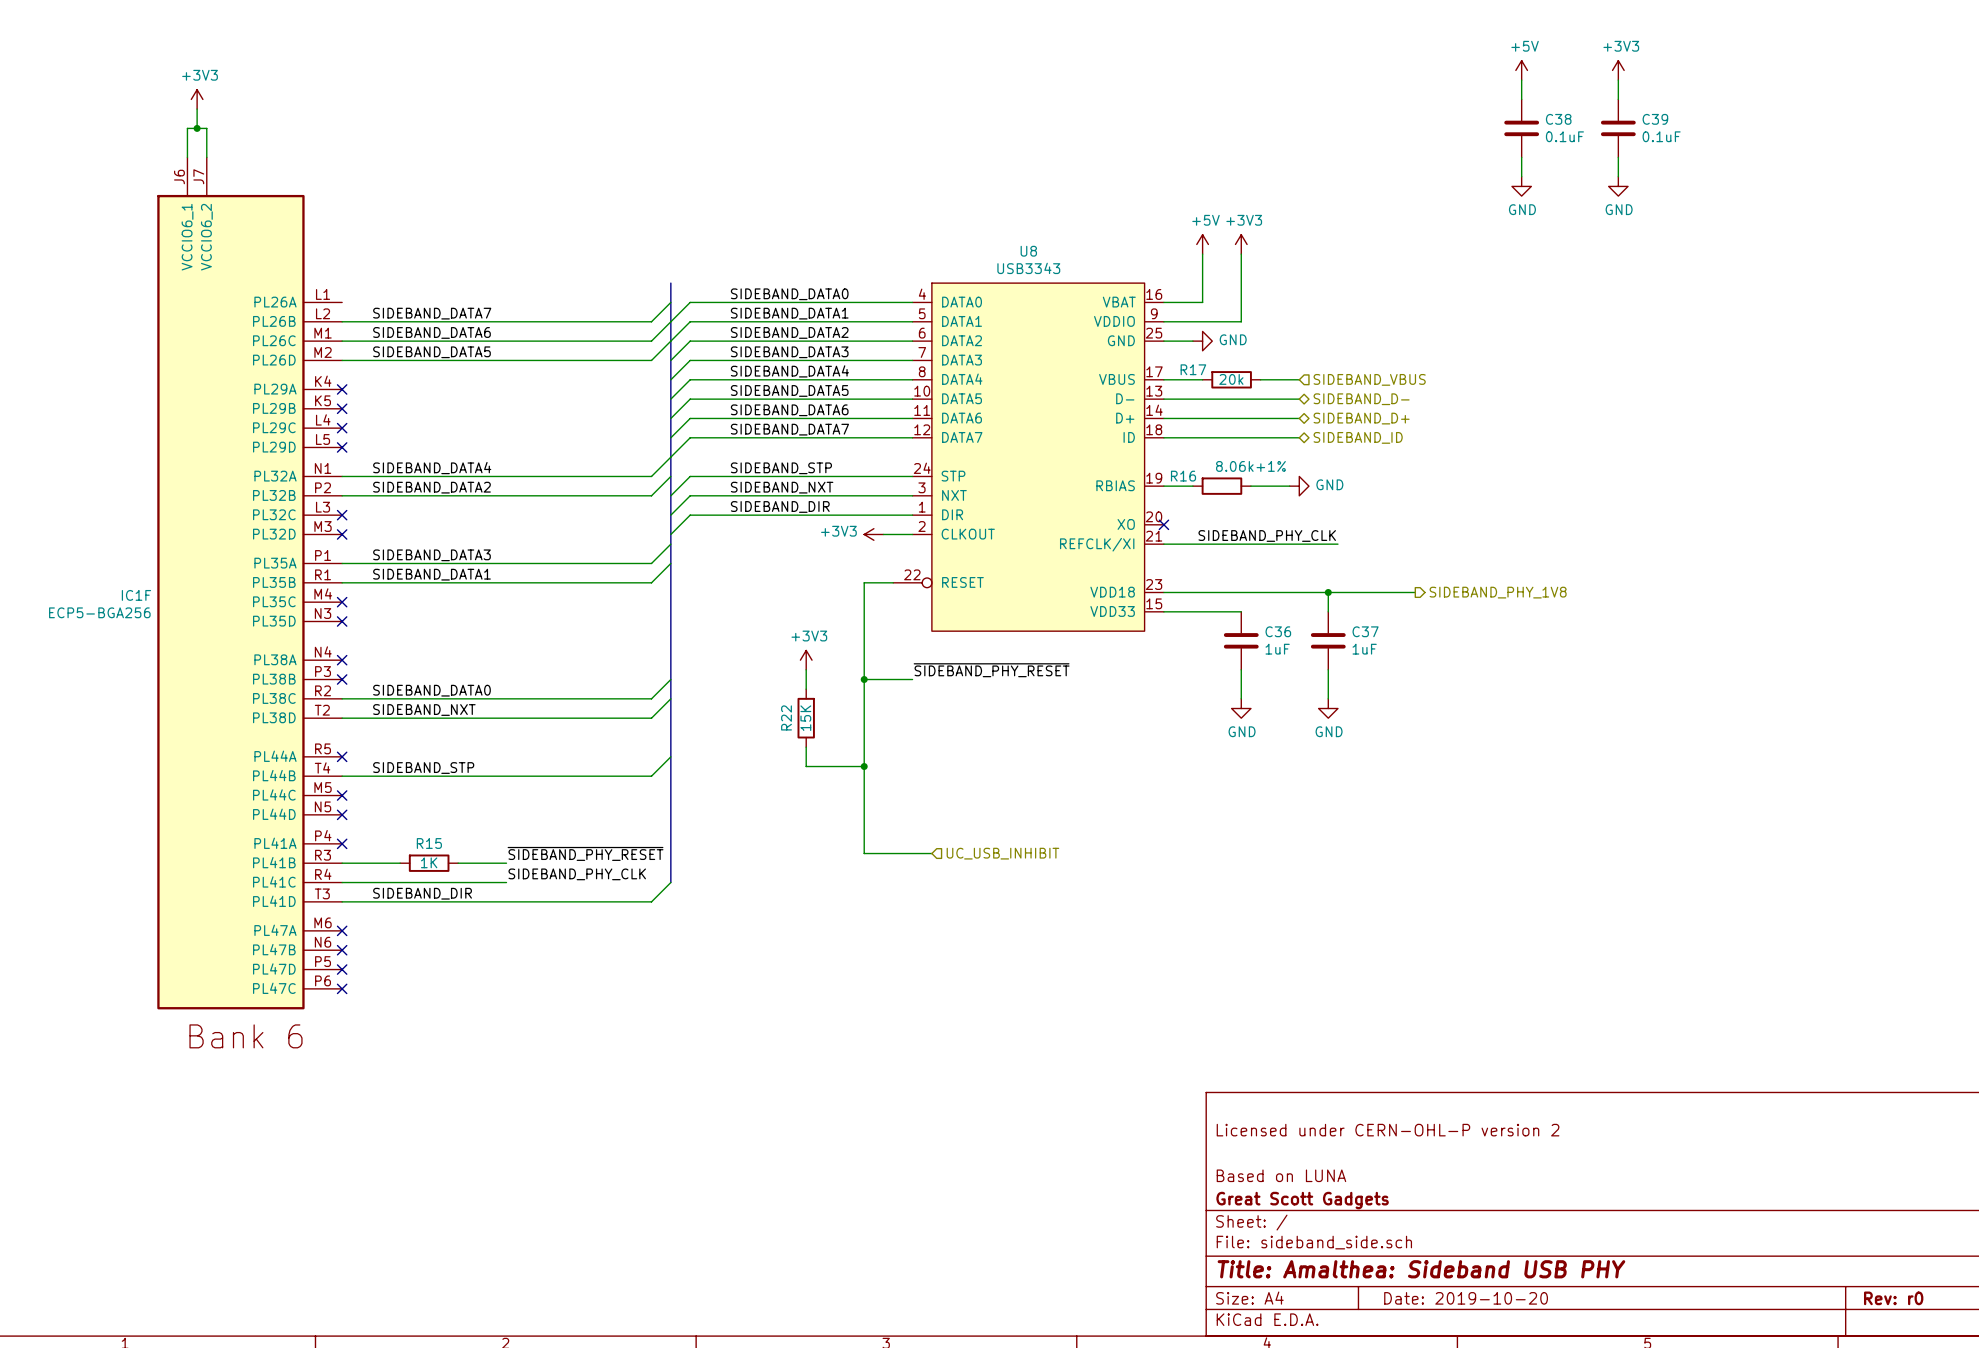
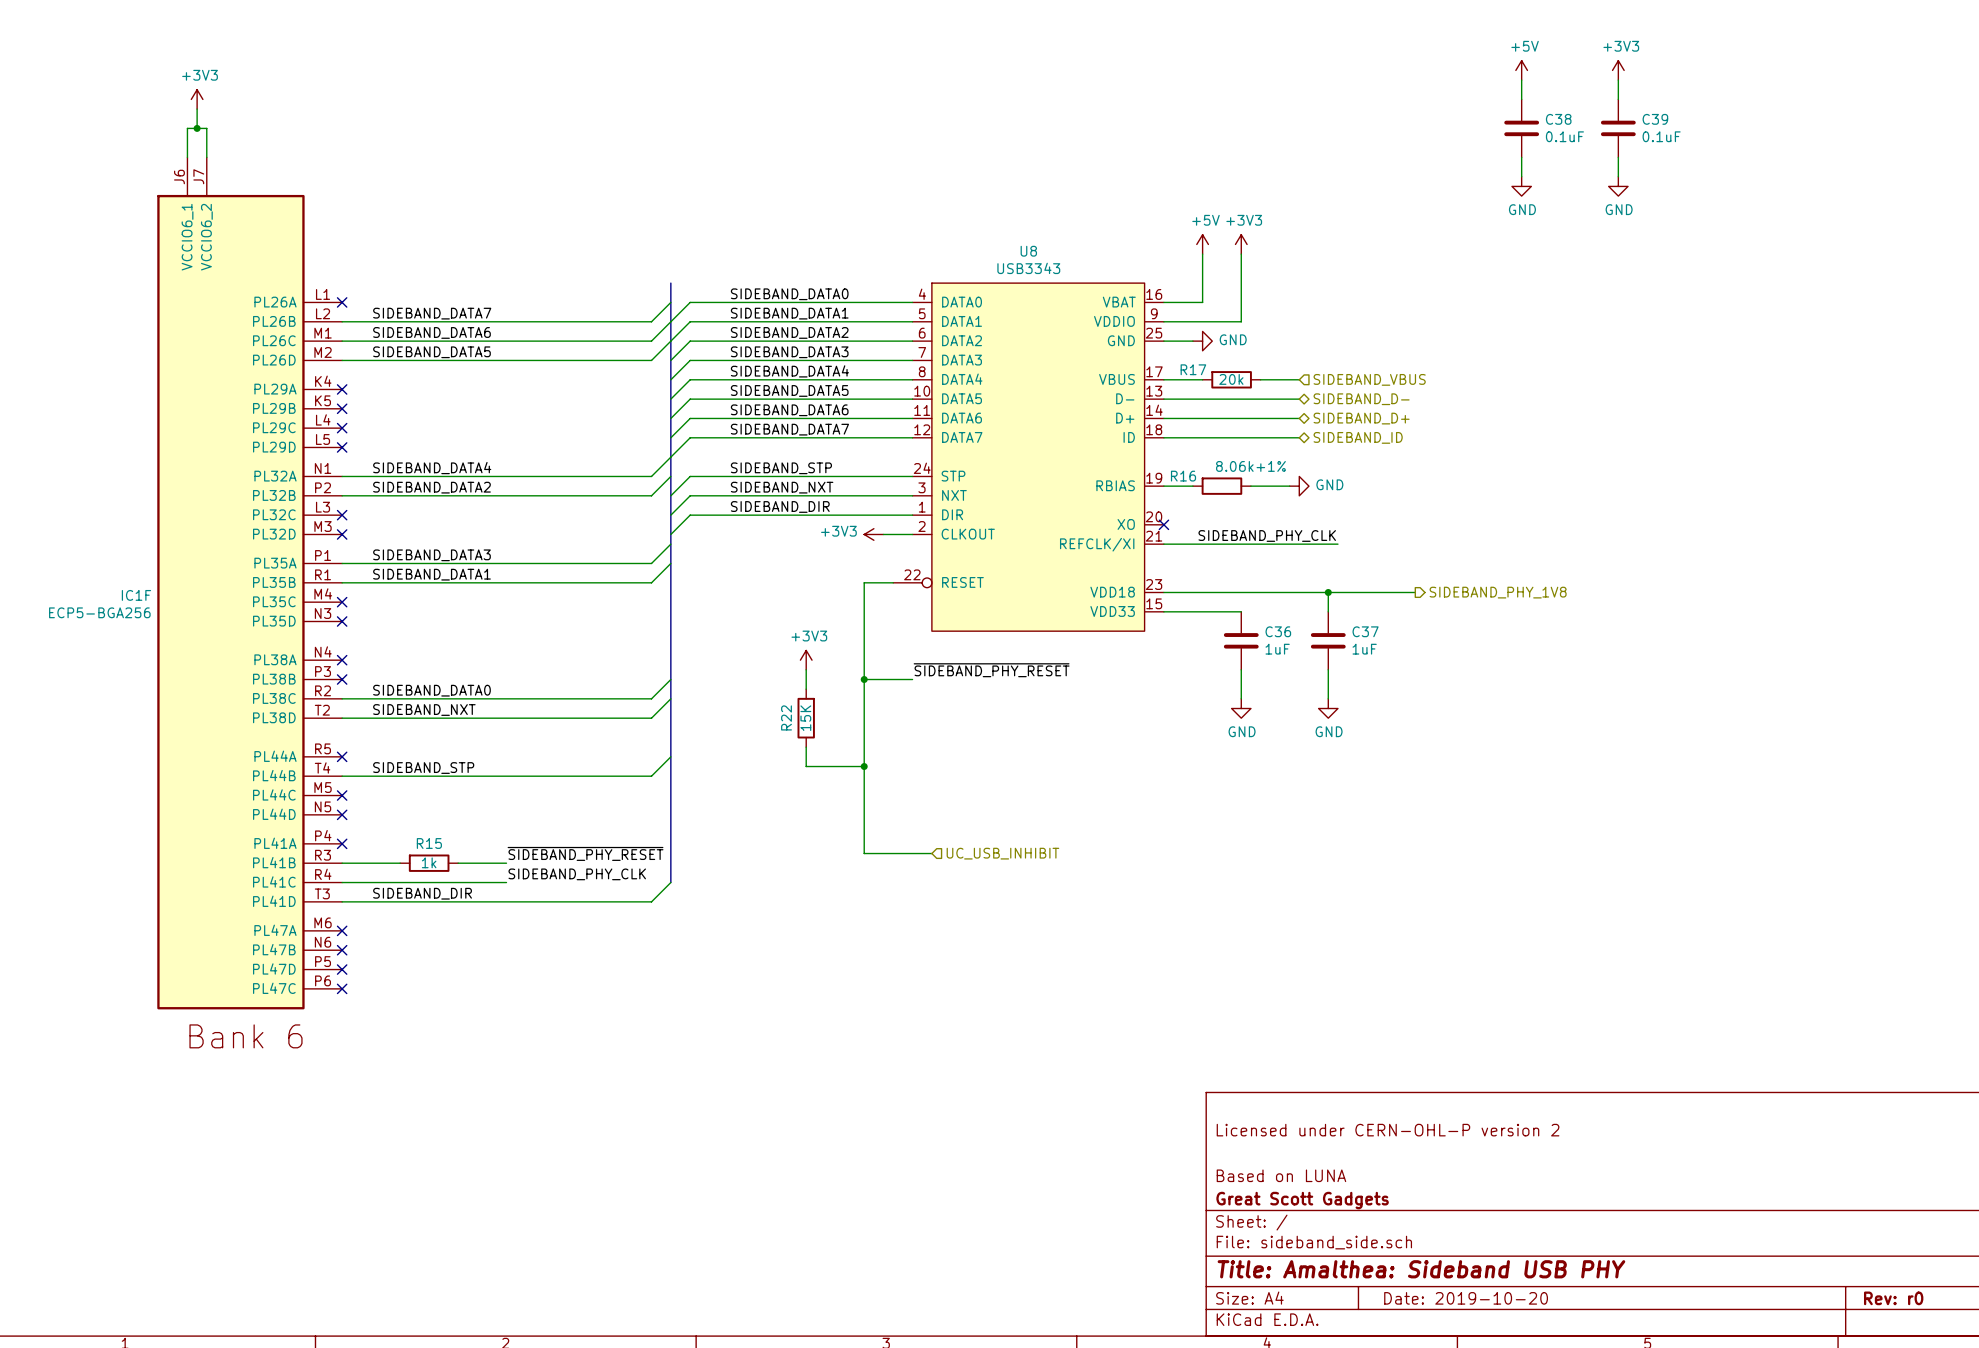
no-connect mark: none -> (342, 302)
R15 value: 1K (429, 862) -> 1k (429, 862)

